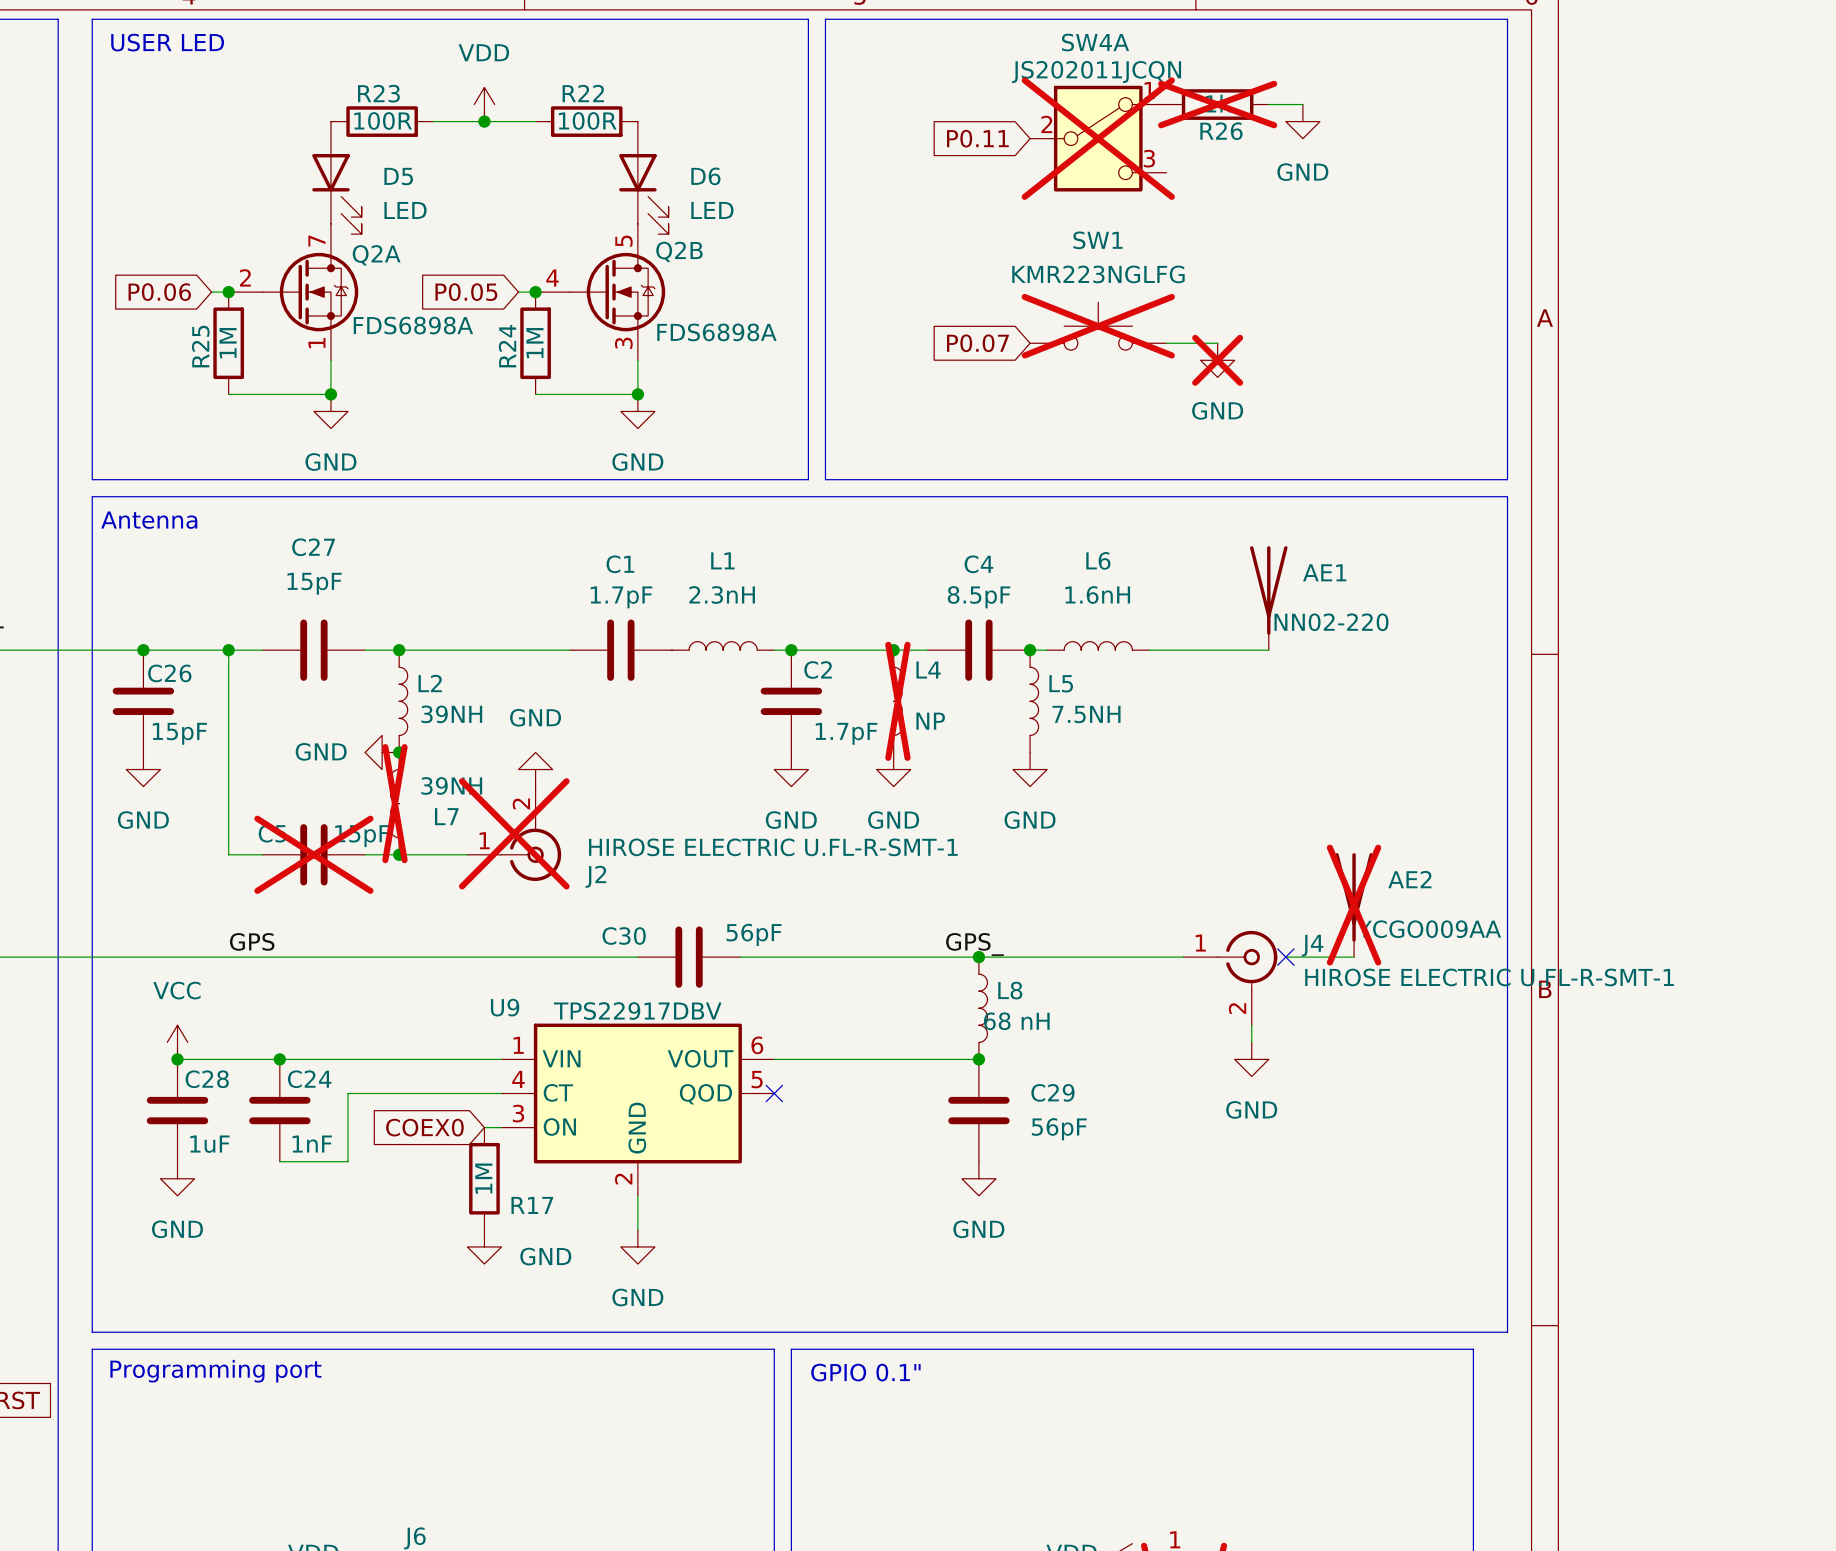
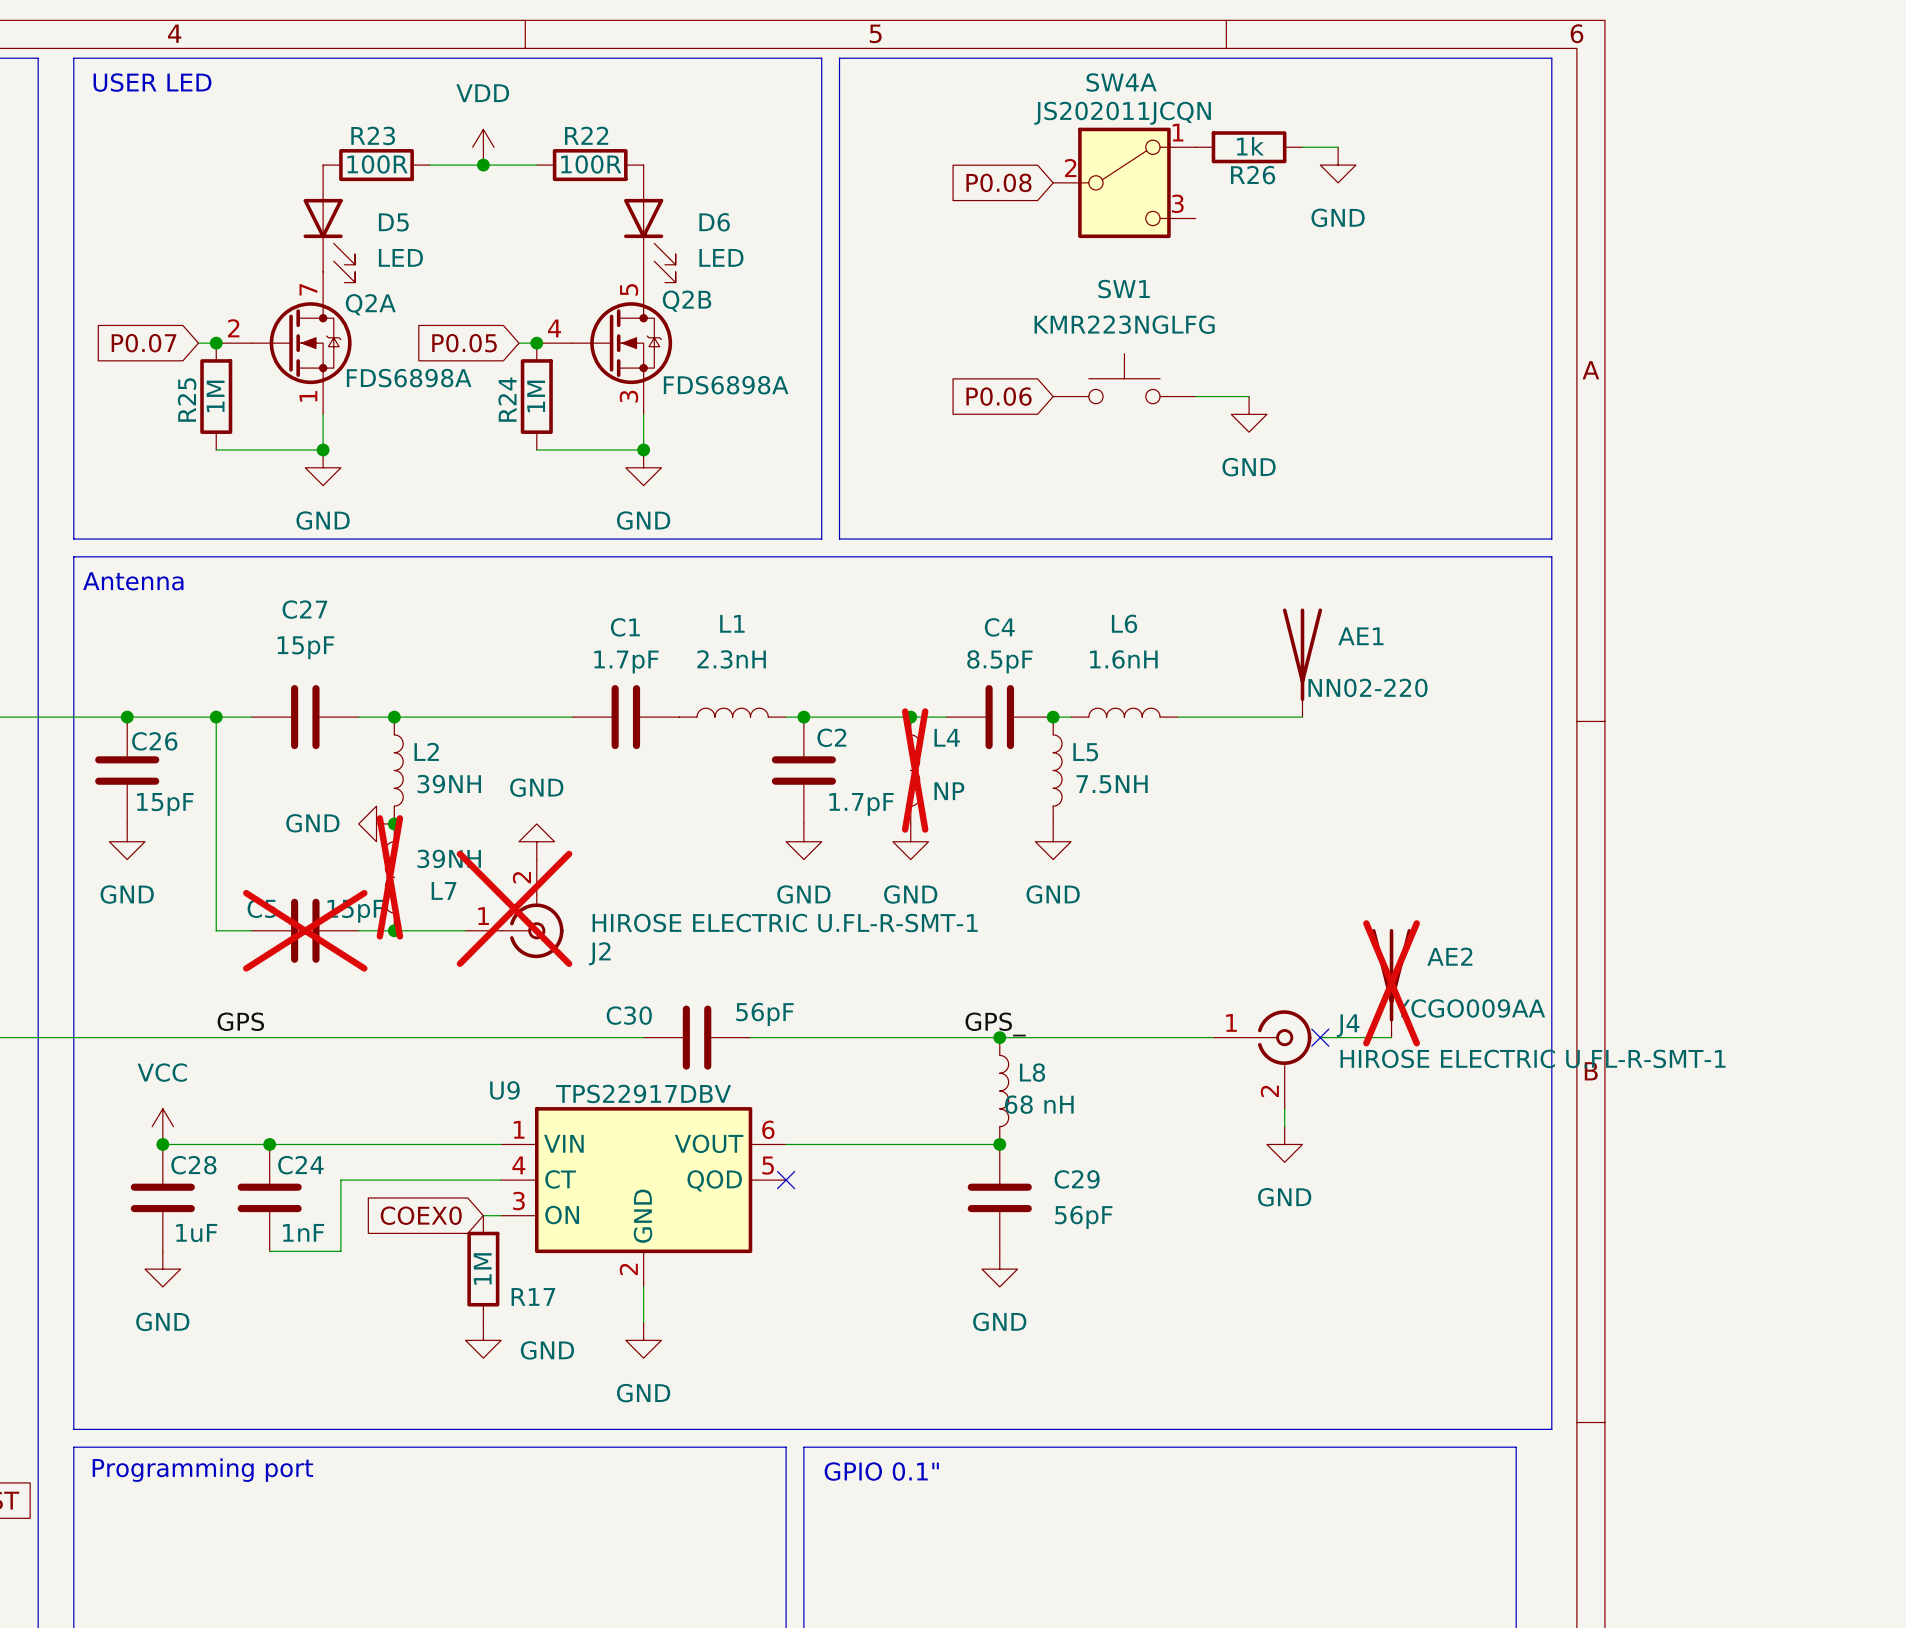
R26 do-not-place cross: (1217, 104) -> none
global label: P0.11 (977, 138) -> P0.08 (998, 182)
SW4A do-not-place cross: (1098, 138) -> none
global label: P0.06 (159, 292) -> P0.07 (144, 343)
SW1 do-not-place cross: (1098, 326) -> none
global label: P0.07 (977, 343) -> P0.06 (999, 396)
power symbol do-not-place cross: (1217, 360) -> none

